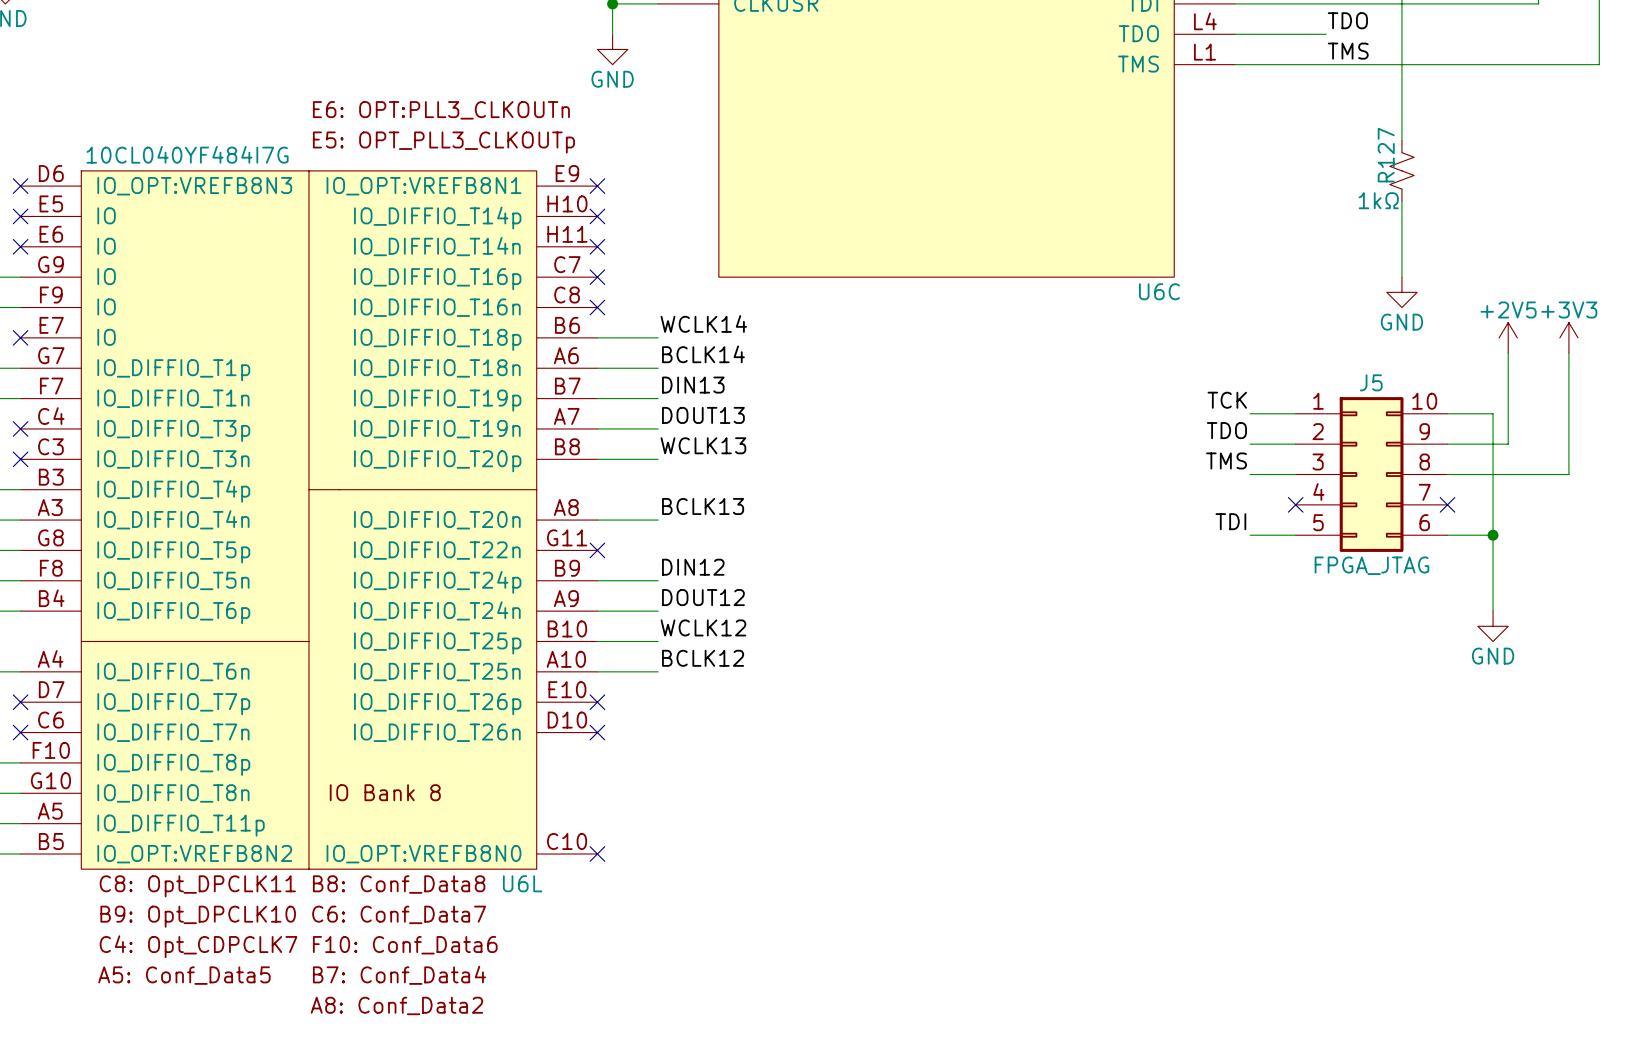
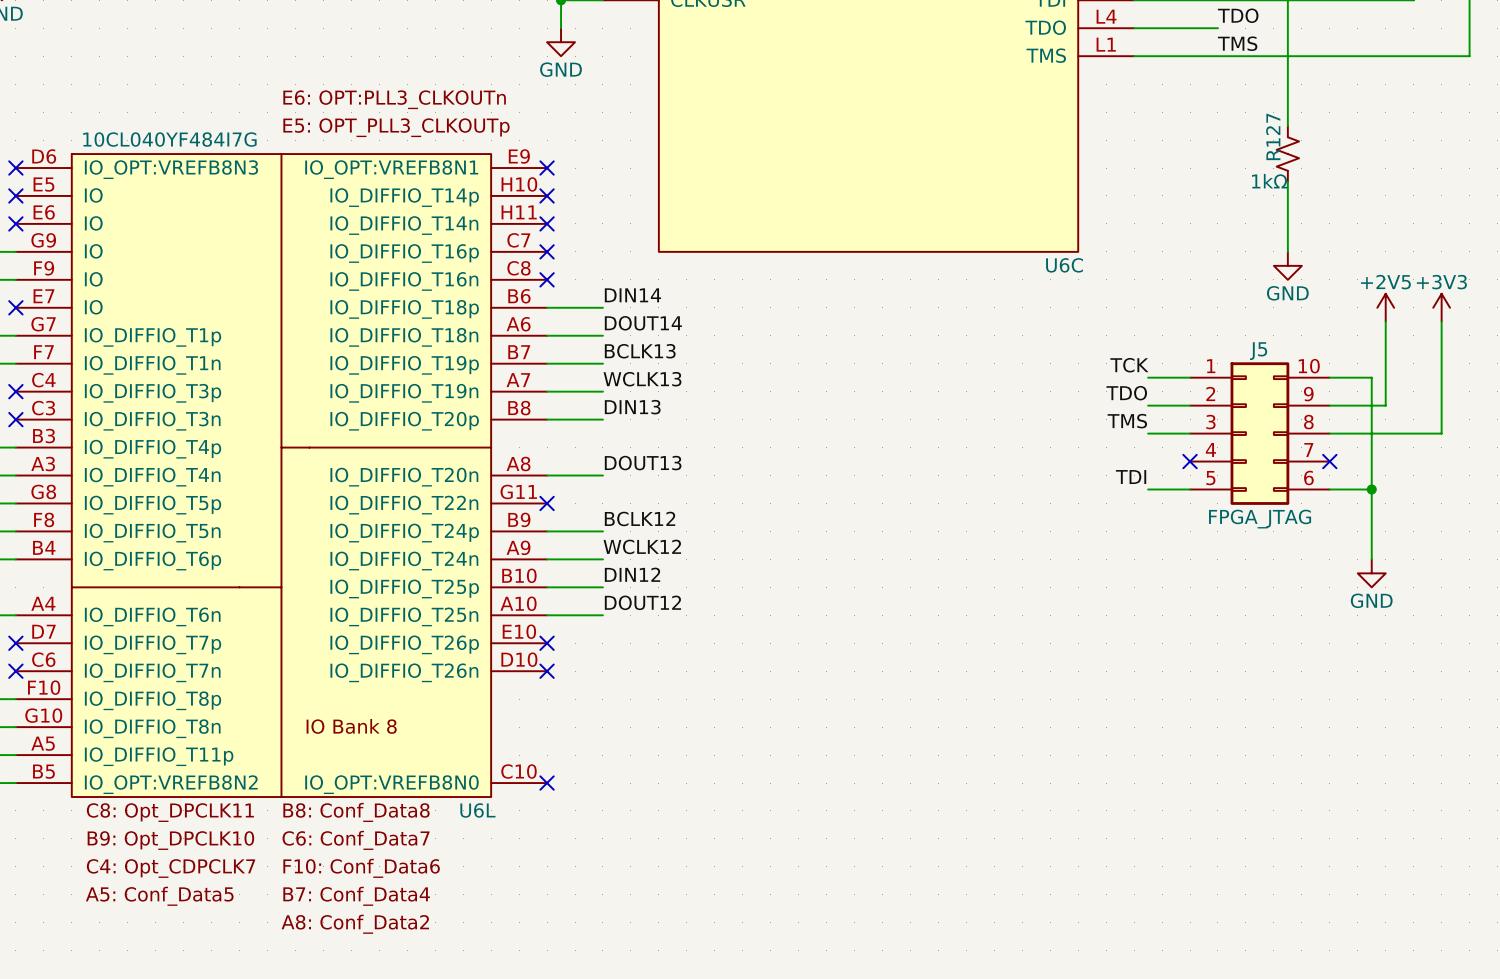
label: WCLK14 (703, 323) -> DIN14 (632, 295)
label: BCLK14 (703, 354) -> DOUT14 (643, 323)
label: DIN13 (693, 385) -> BCLK13 (640, 351)
label: DOUT13 (703, 415) -> WCLK13 (642, 379)
label: WCLK13 (703, 445) -> DIN13 (632, 407)
label: BCLK13 (703, 506) -> DOUT13 (643, 463)
label: DIN12 (693, 567) -> BCLK12 (640, 518)
label: DOUT12 (703, 597) -> WCLK12 (642, 546)
label: WCLK12 (703, 627) -> DIN12 (632, 574)
label: BCLK12 (703, 658) -> DOUT12 (642, 602)

